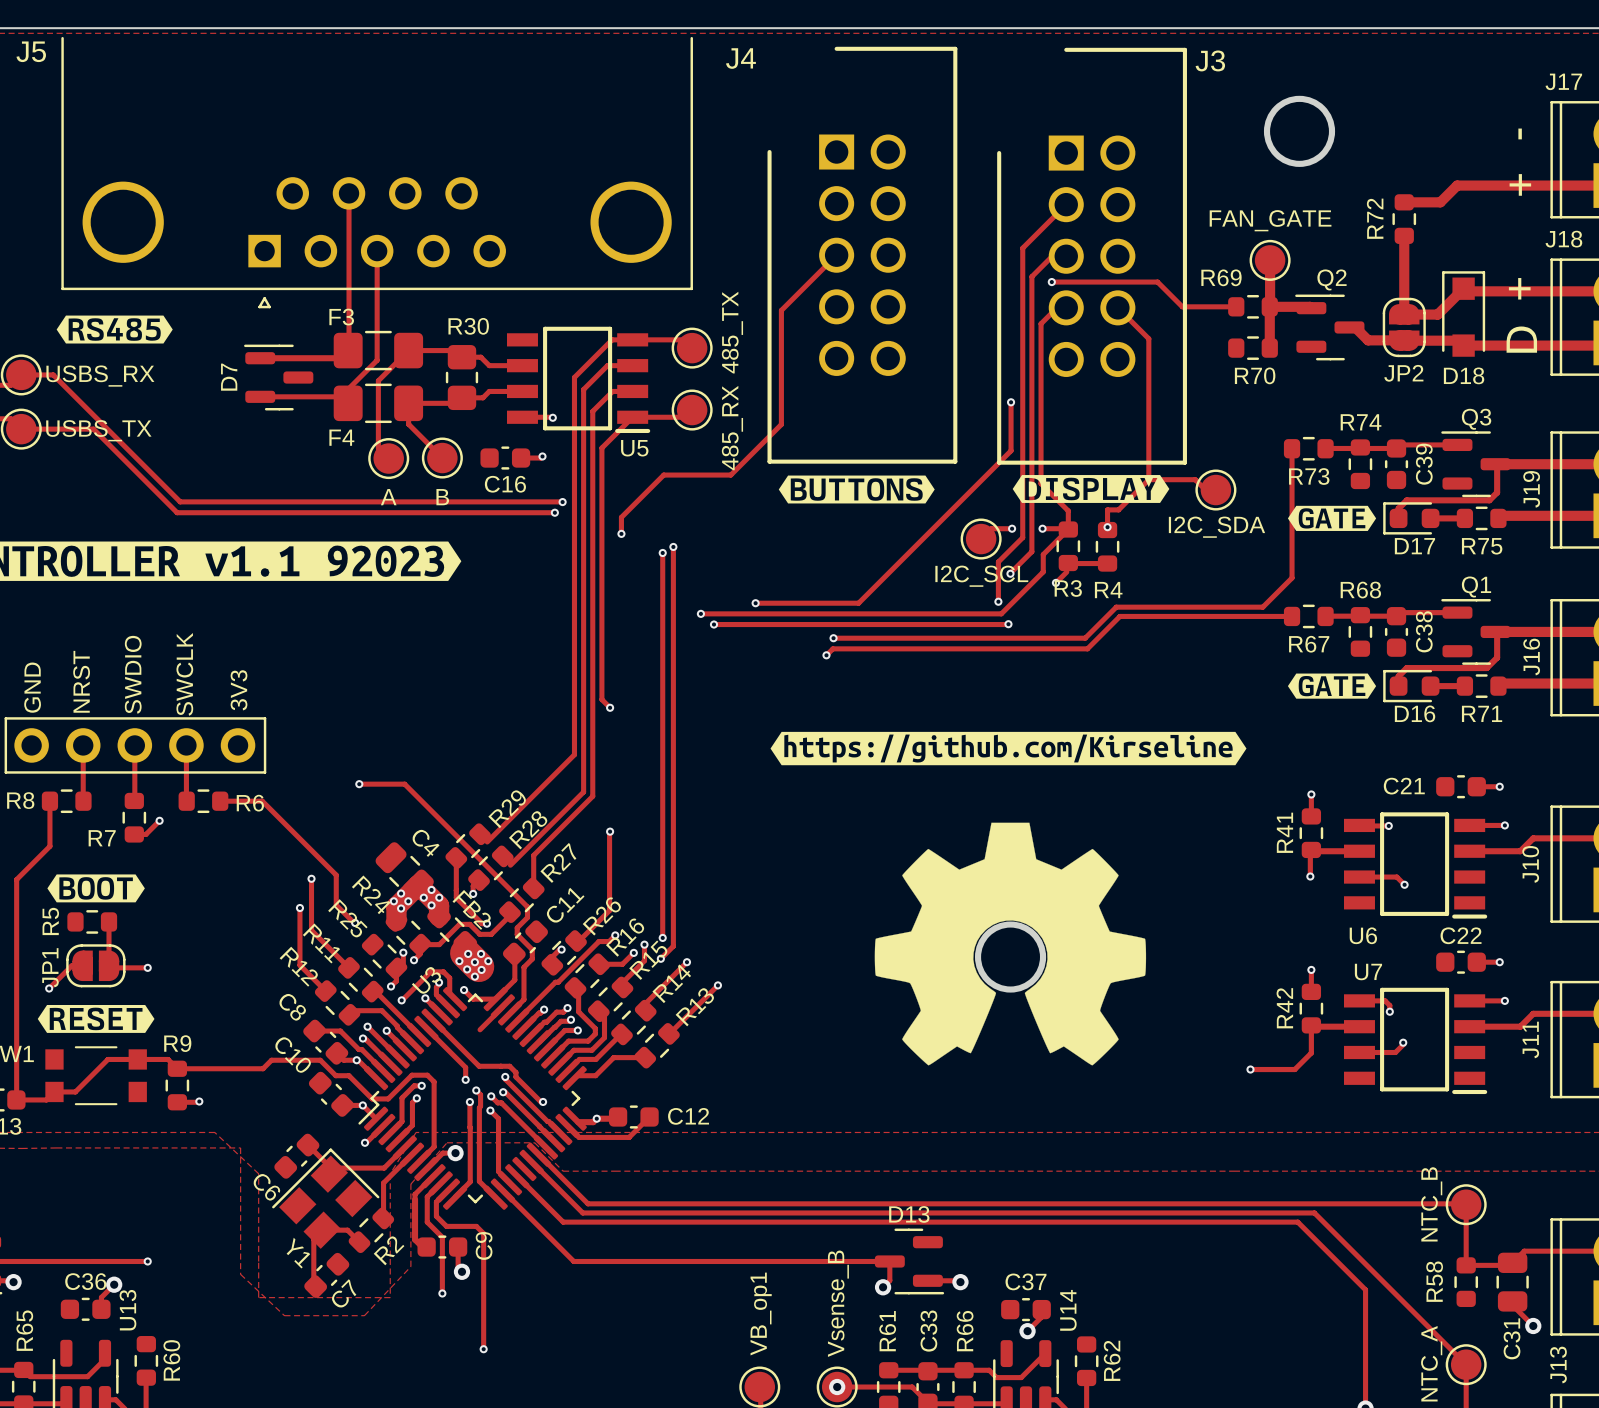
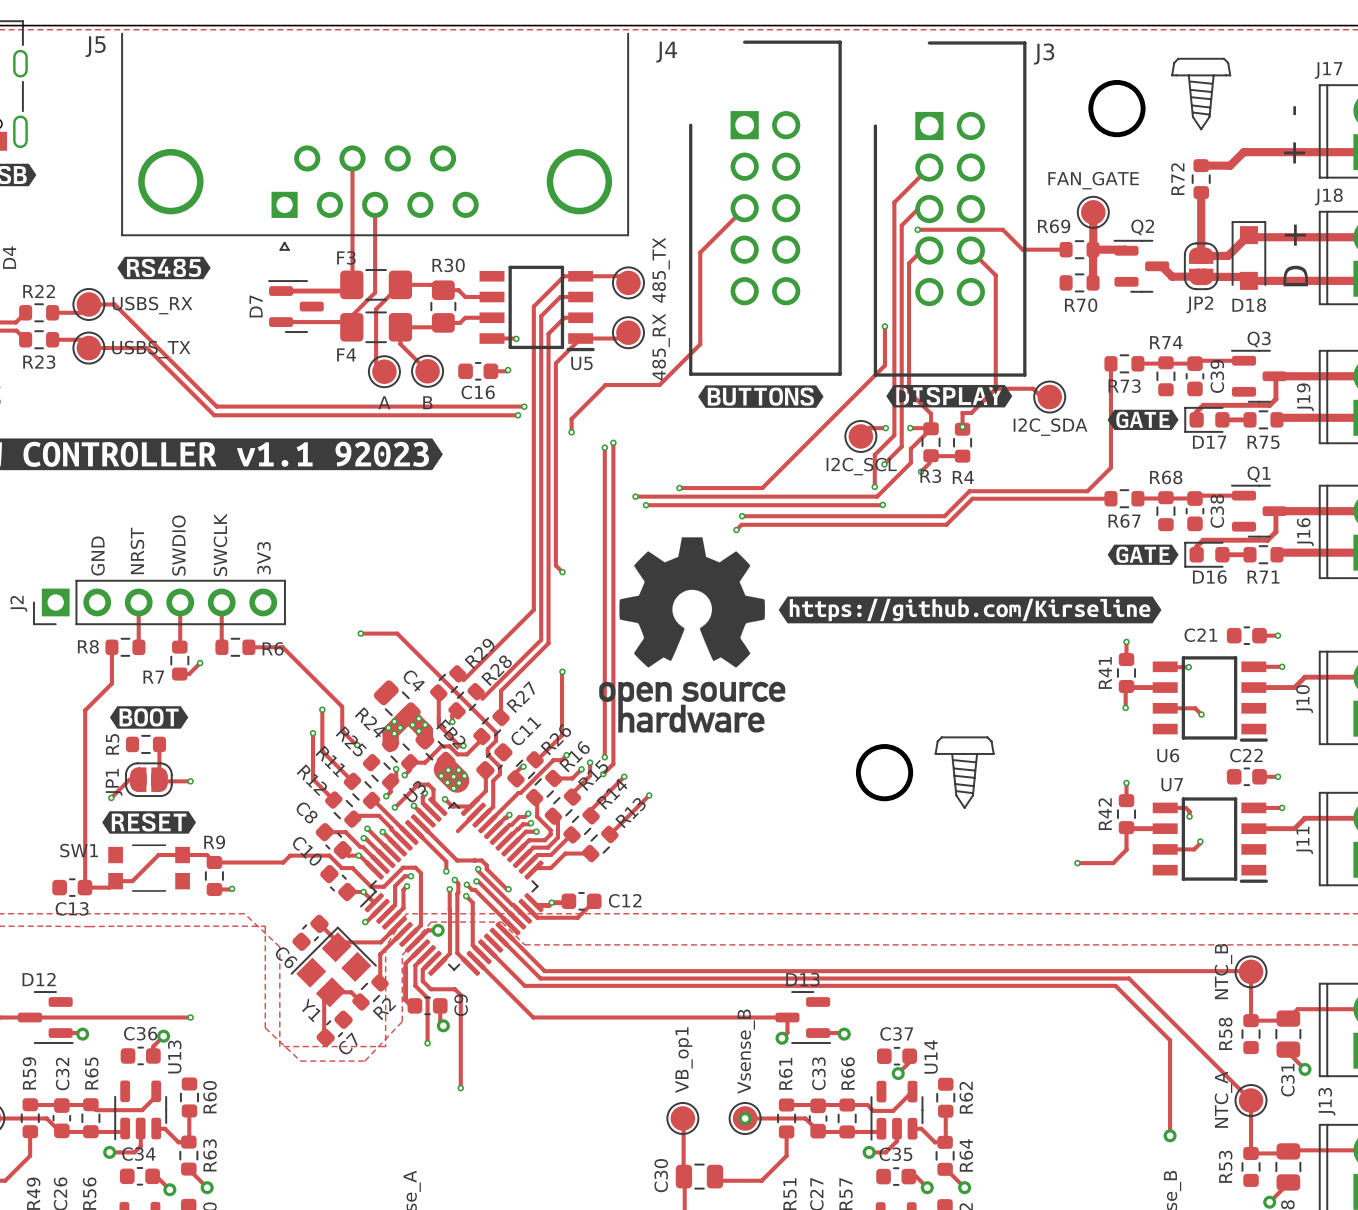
drawing: none -> [1171, 57, 1232, 131]
drawing: none -> [599, 537, 786, 733]
drawing position: (1008, 748) -> (970, 609)
drawing: [874, 822, 1147, 1066] -> none
drawing: none -> [934, 736, 995, 809]

